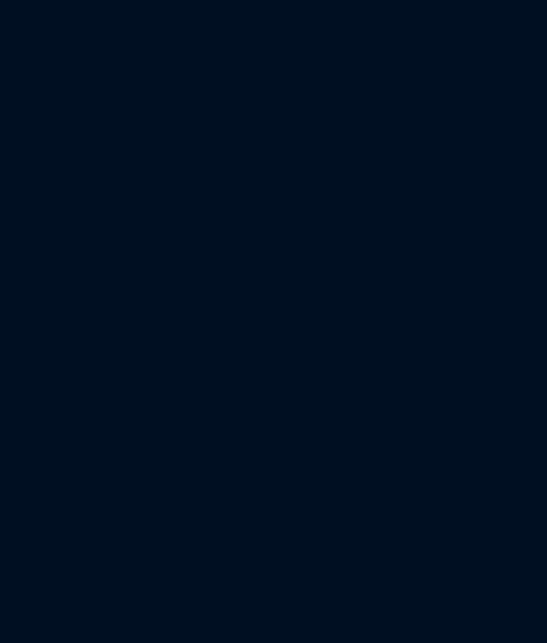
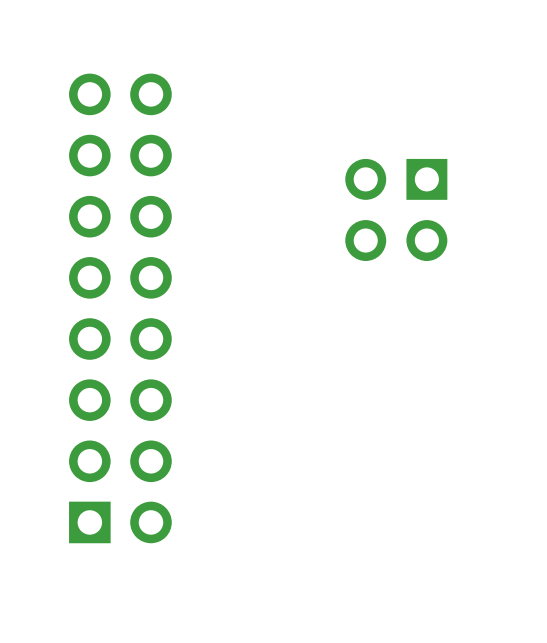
part: none -> (396, 209)
part: none -> (120, 308)

